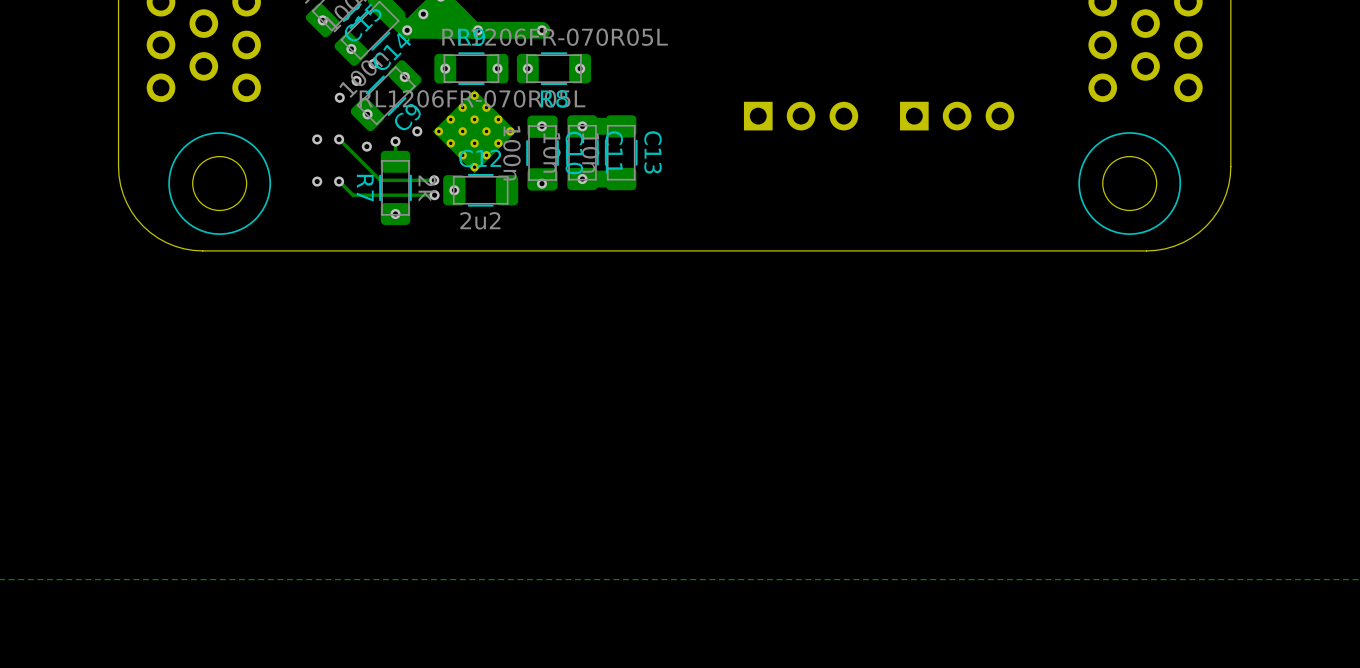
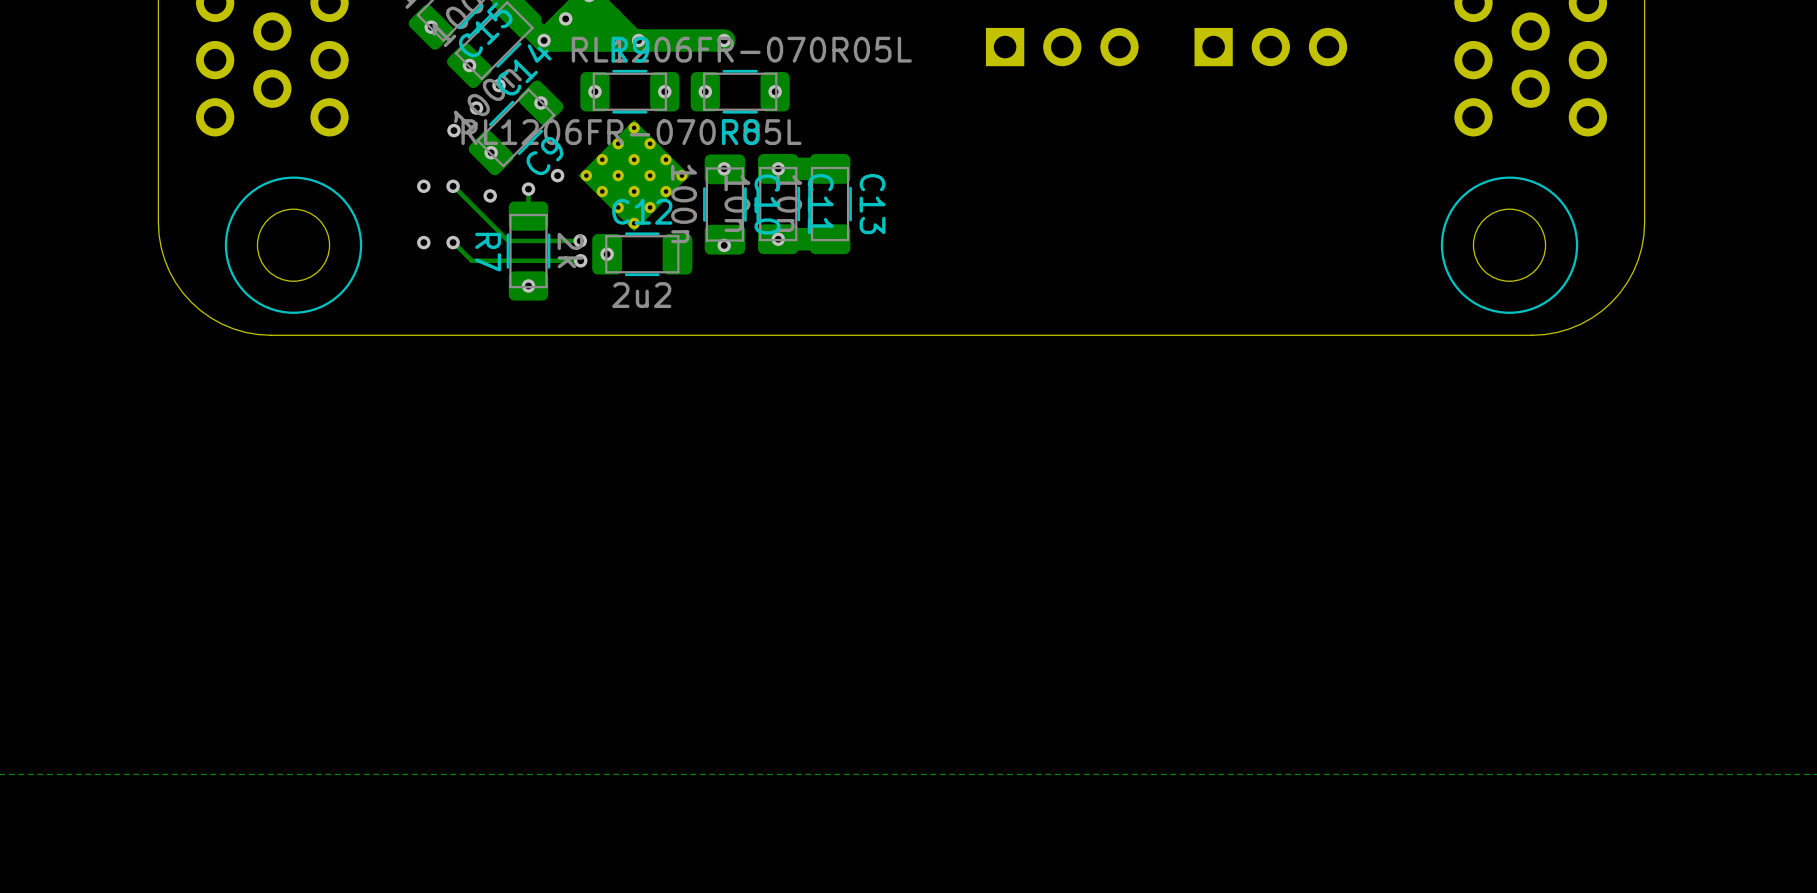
part position: (801, 116) -> (1062, 47)
part position: (957, 116) -> (1270, 47)

